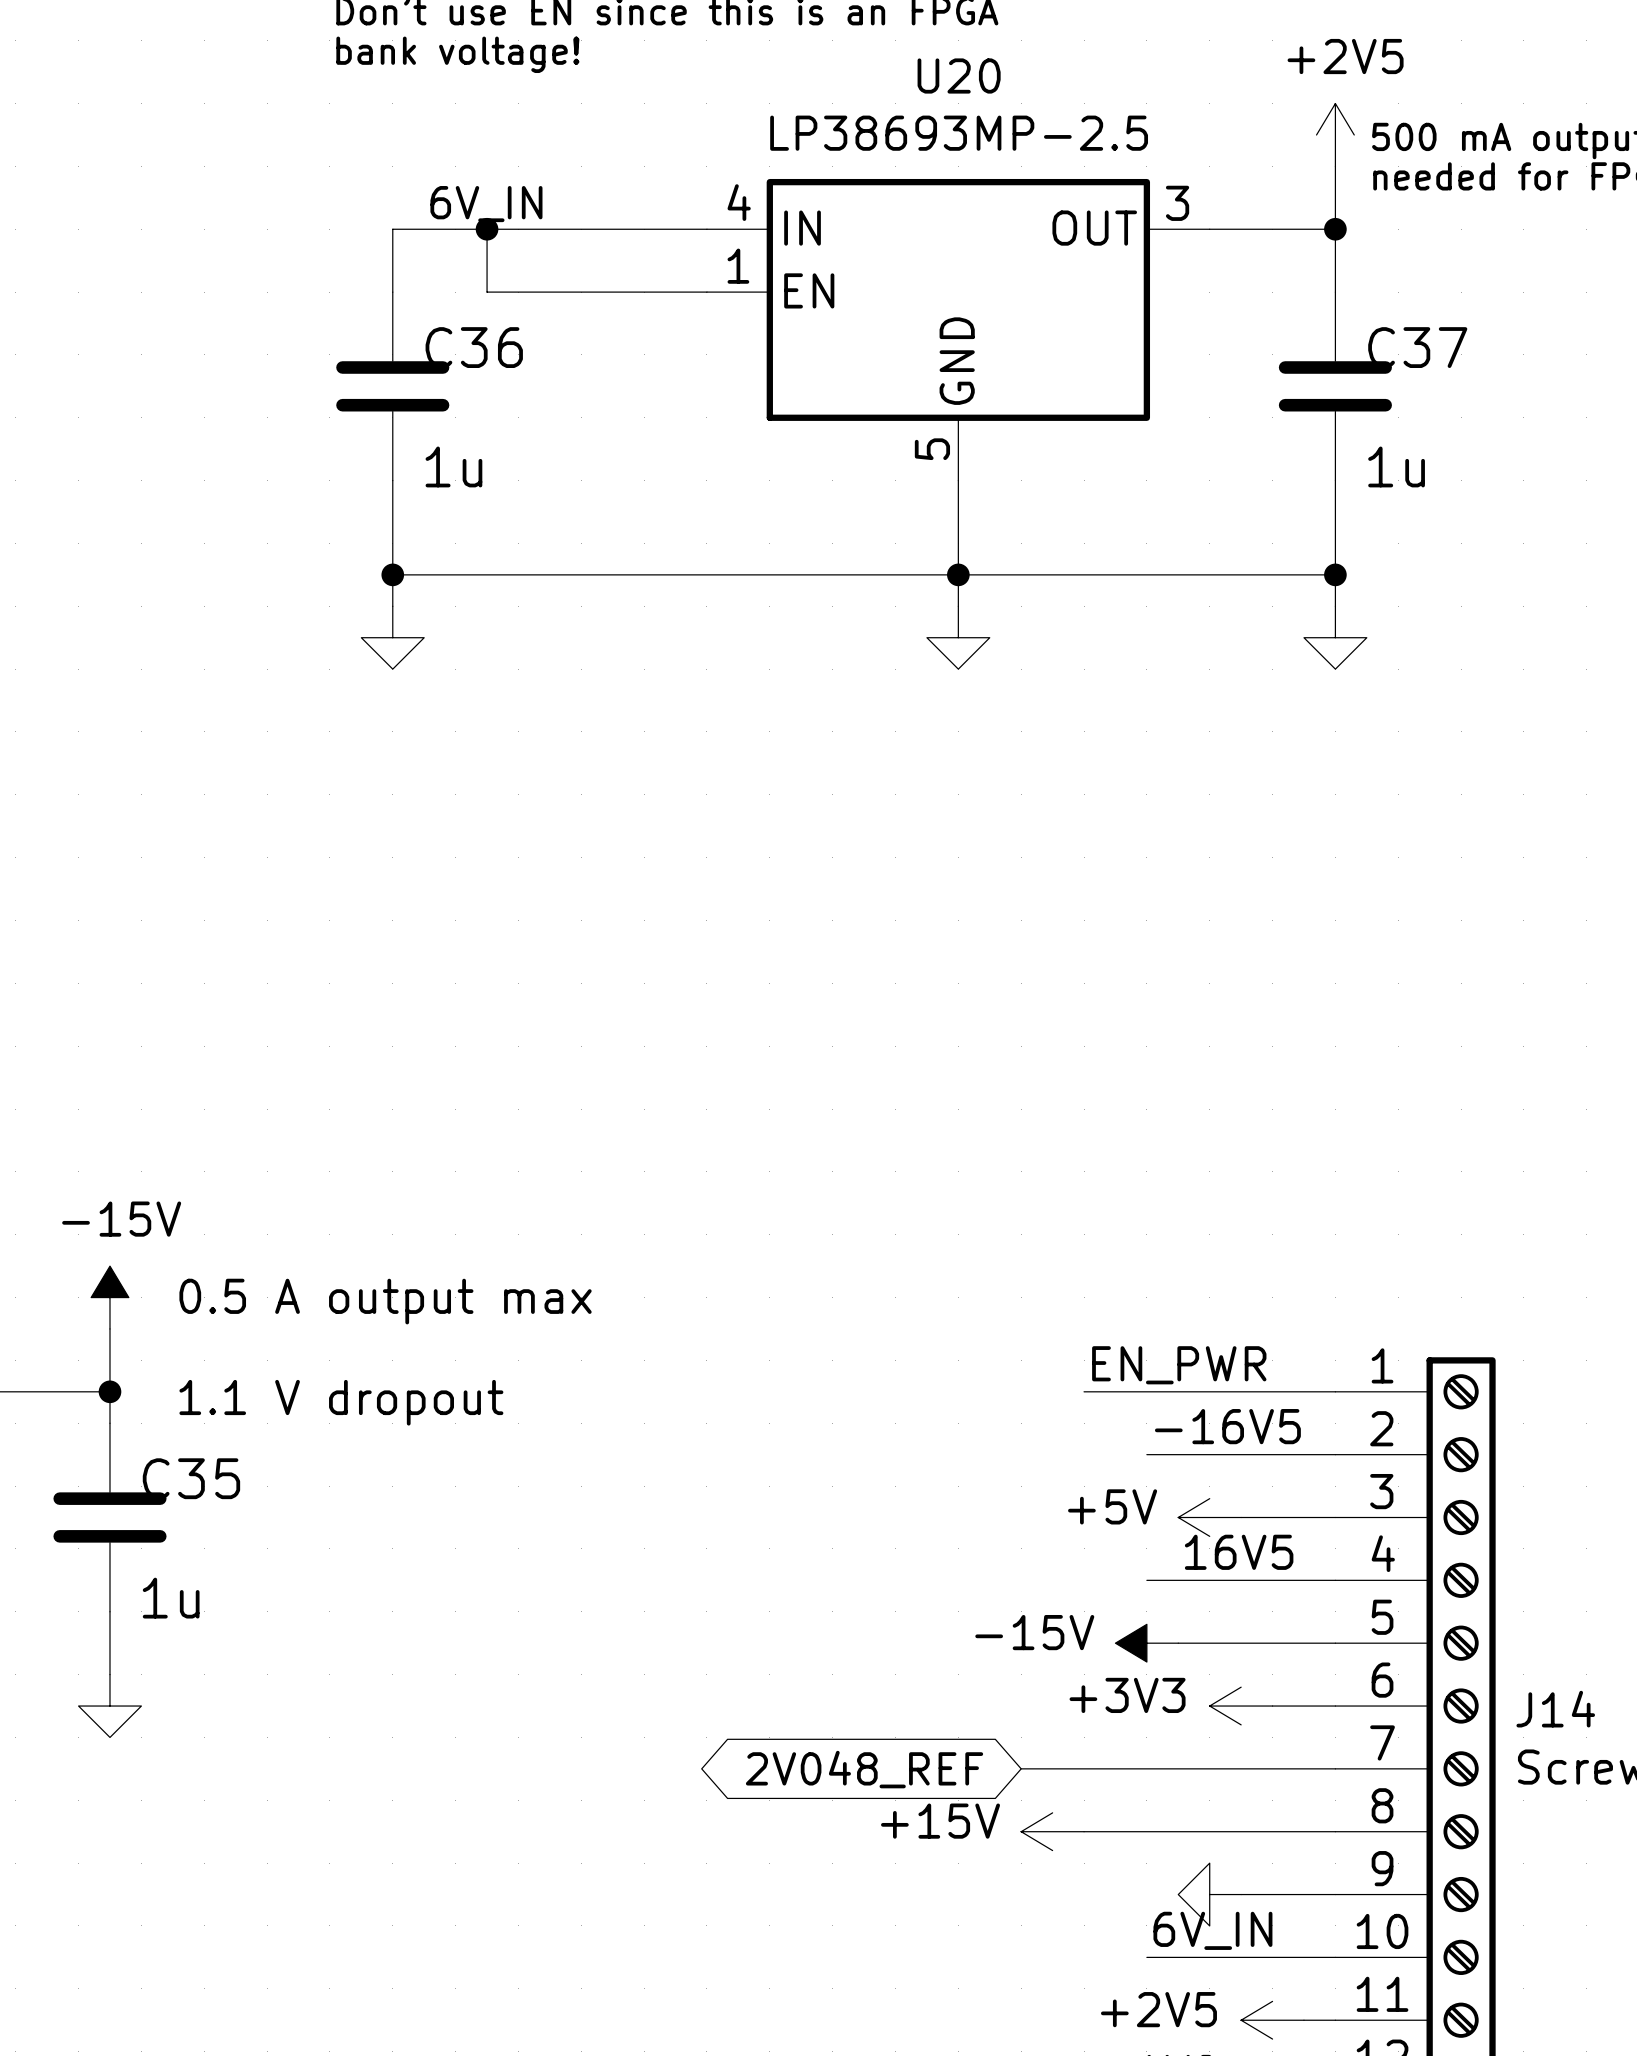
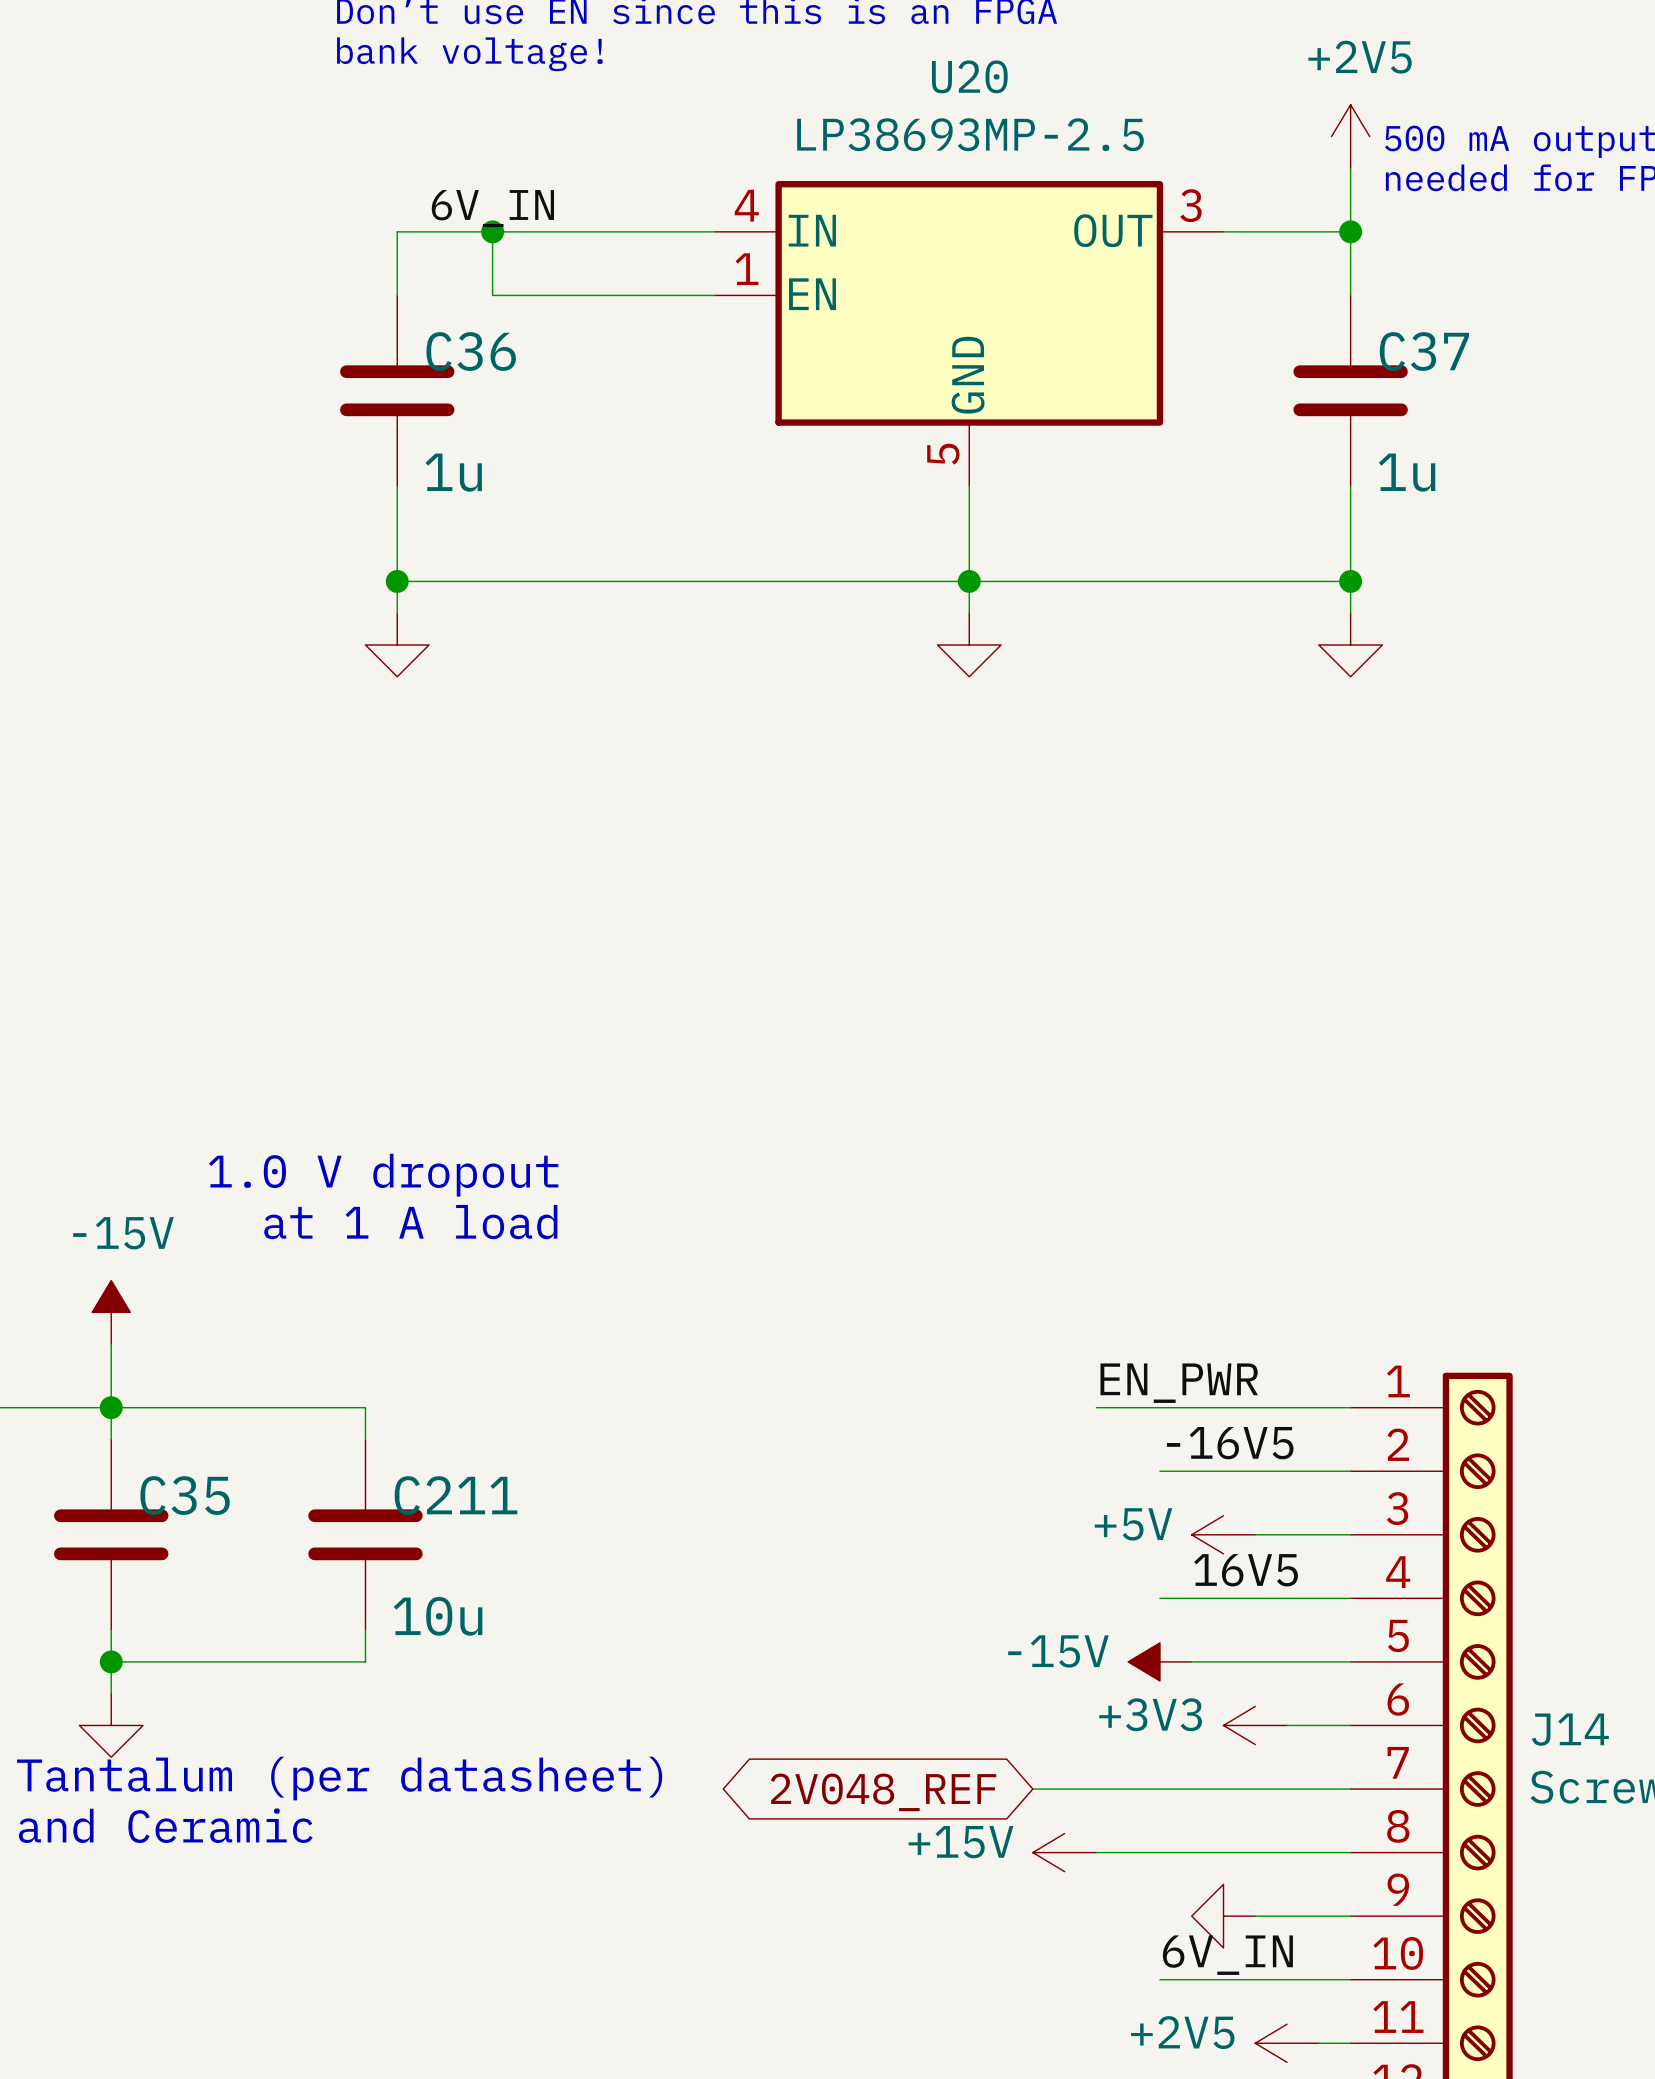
text: none -> 1.0 V dropout (383, 1175)
text: none -> at 1 A load (410, 1222)
text: 0.5 A output max (385, 1301) -> none
wire: none -> (111, 1407) (365, 1407) (365, 1439)
text: 1.1 V dropout (341, 1402) -> none
C211: none -> 10u (365, 1534)
C35 value: 1u (171, 1598) -> none
wire: none -> (365, 1630) (365, 1661) (111, 1661)
junction: none -> (111, 1661)
text: none -> Tantalum (per datasheet) (339, 1778)
text: none -> and Ceramic (165, 1825)

